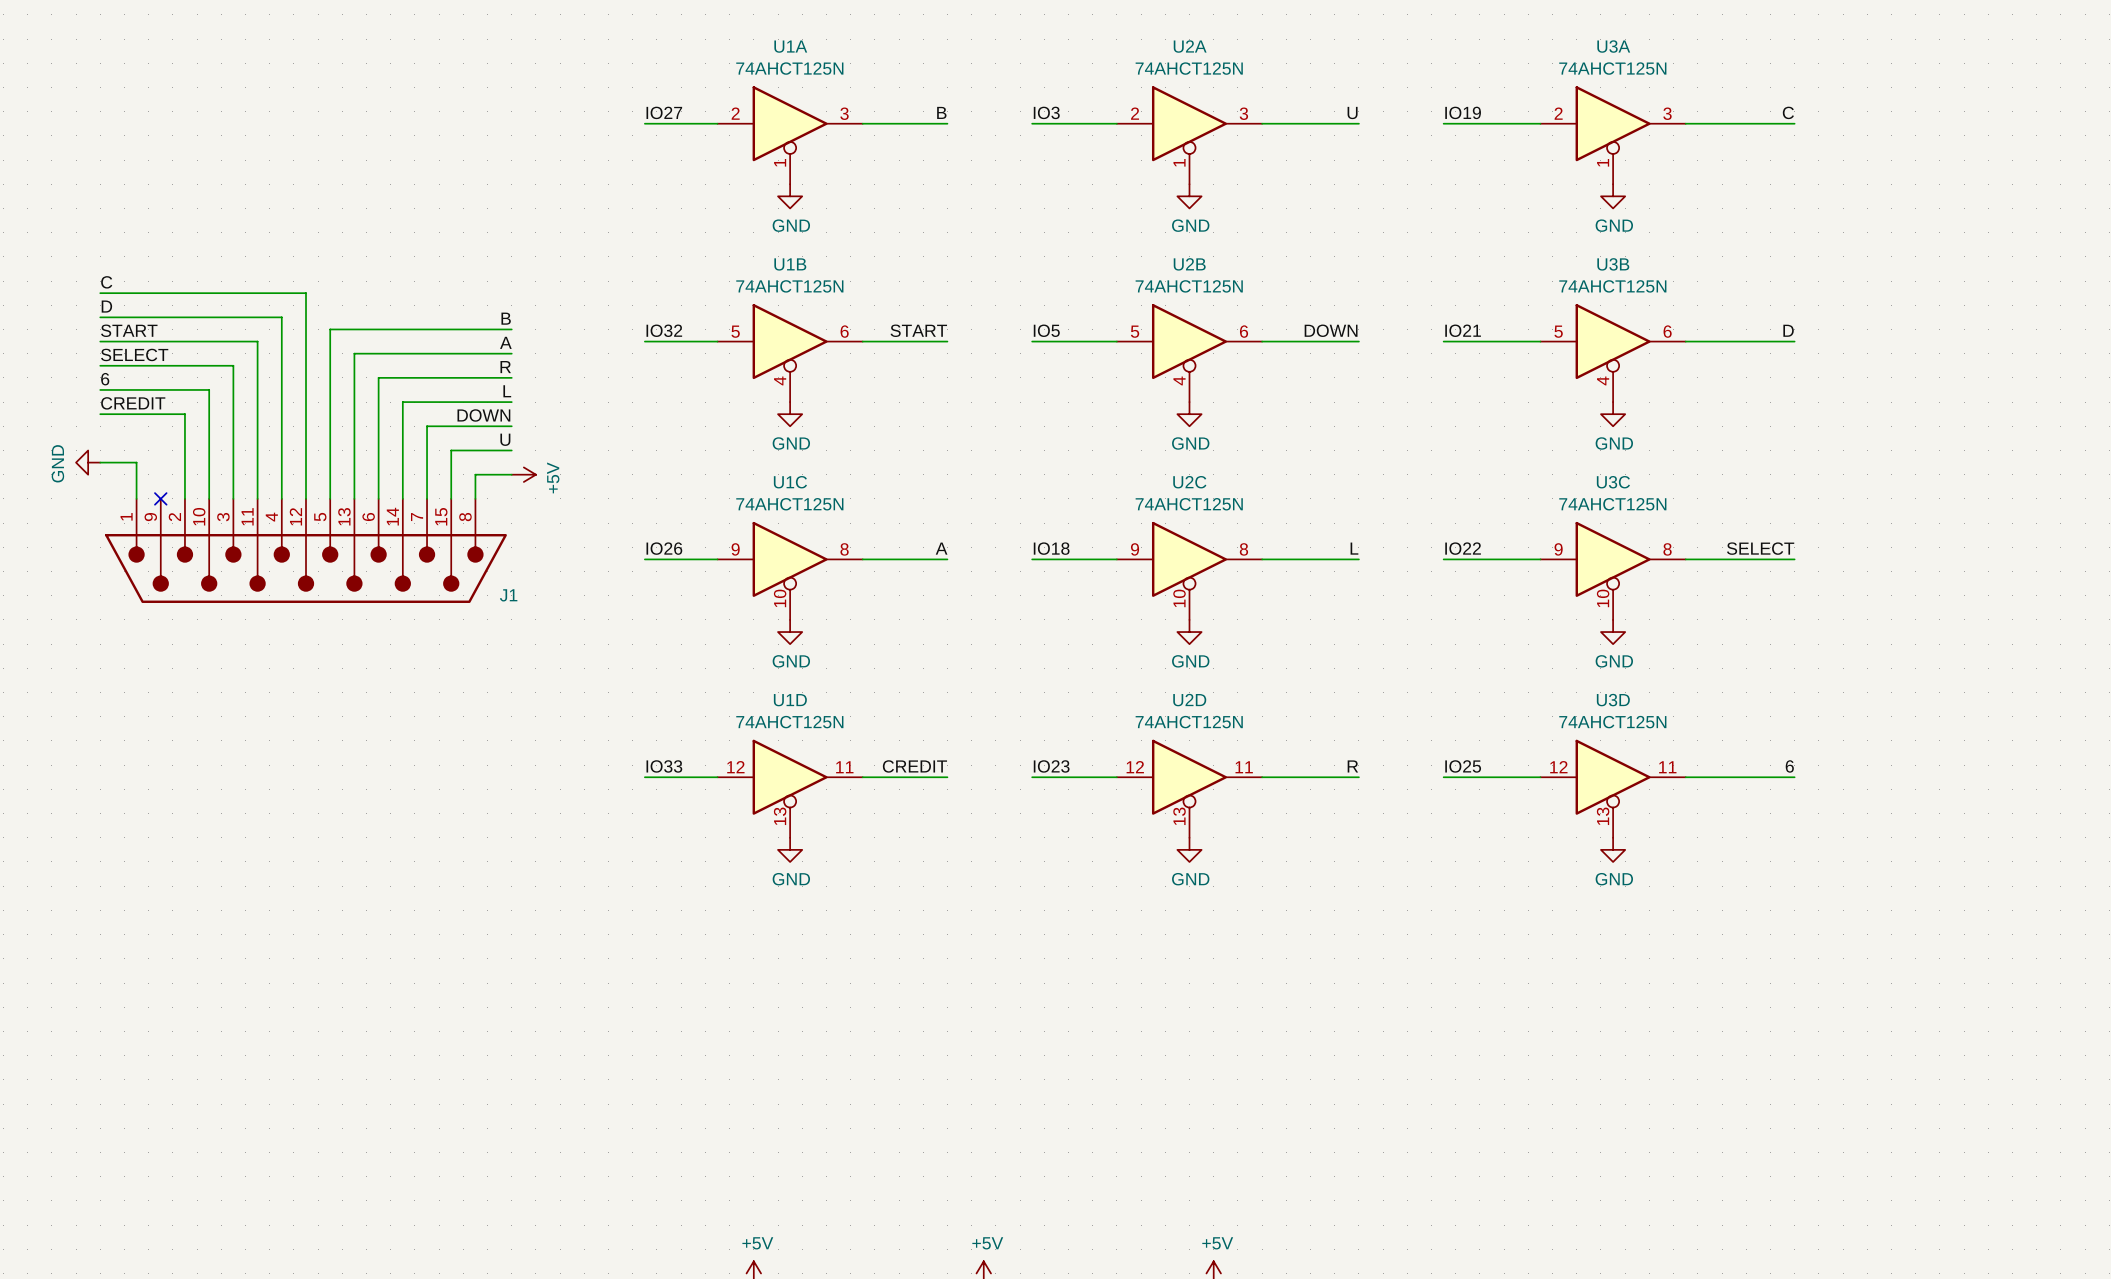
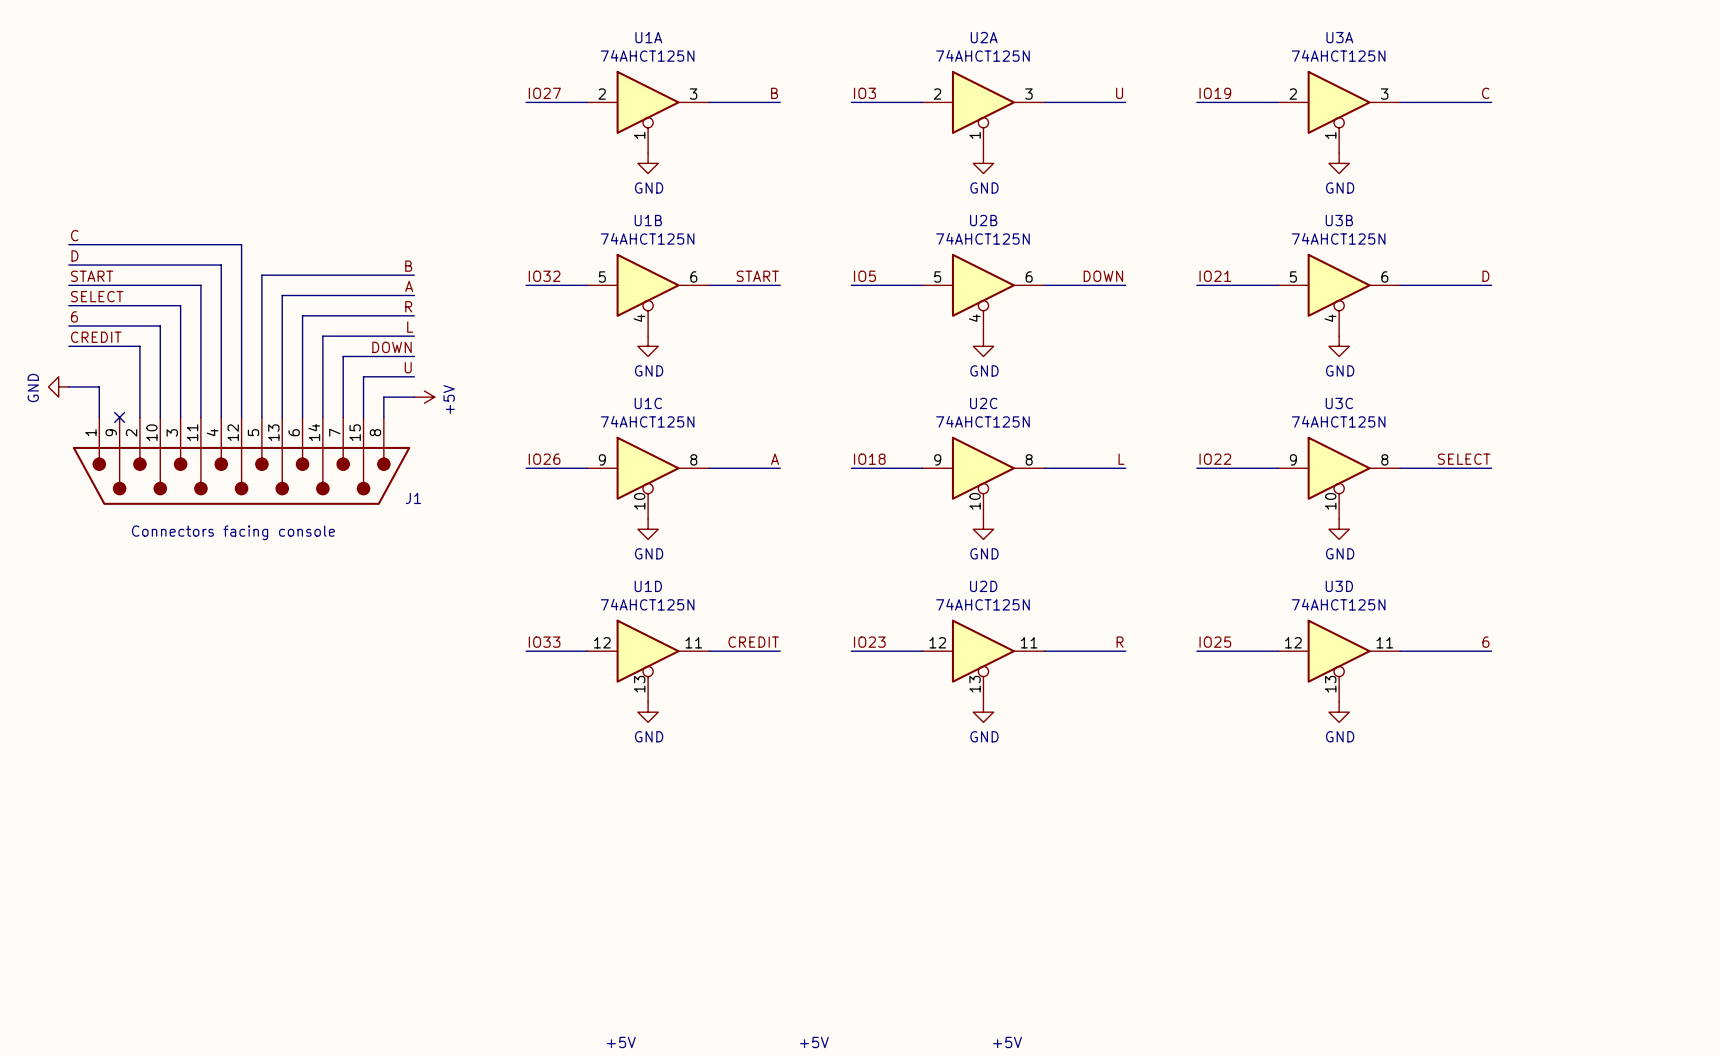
text: none -> Connectors facing console (233, 532)

